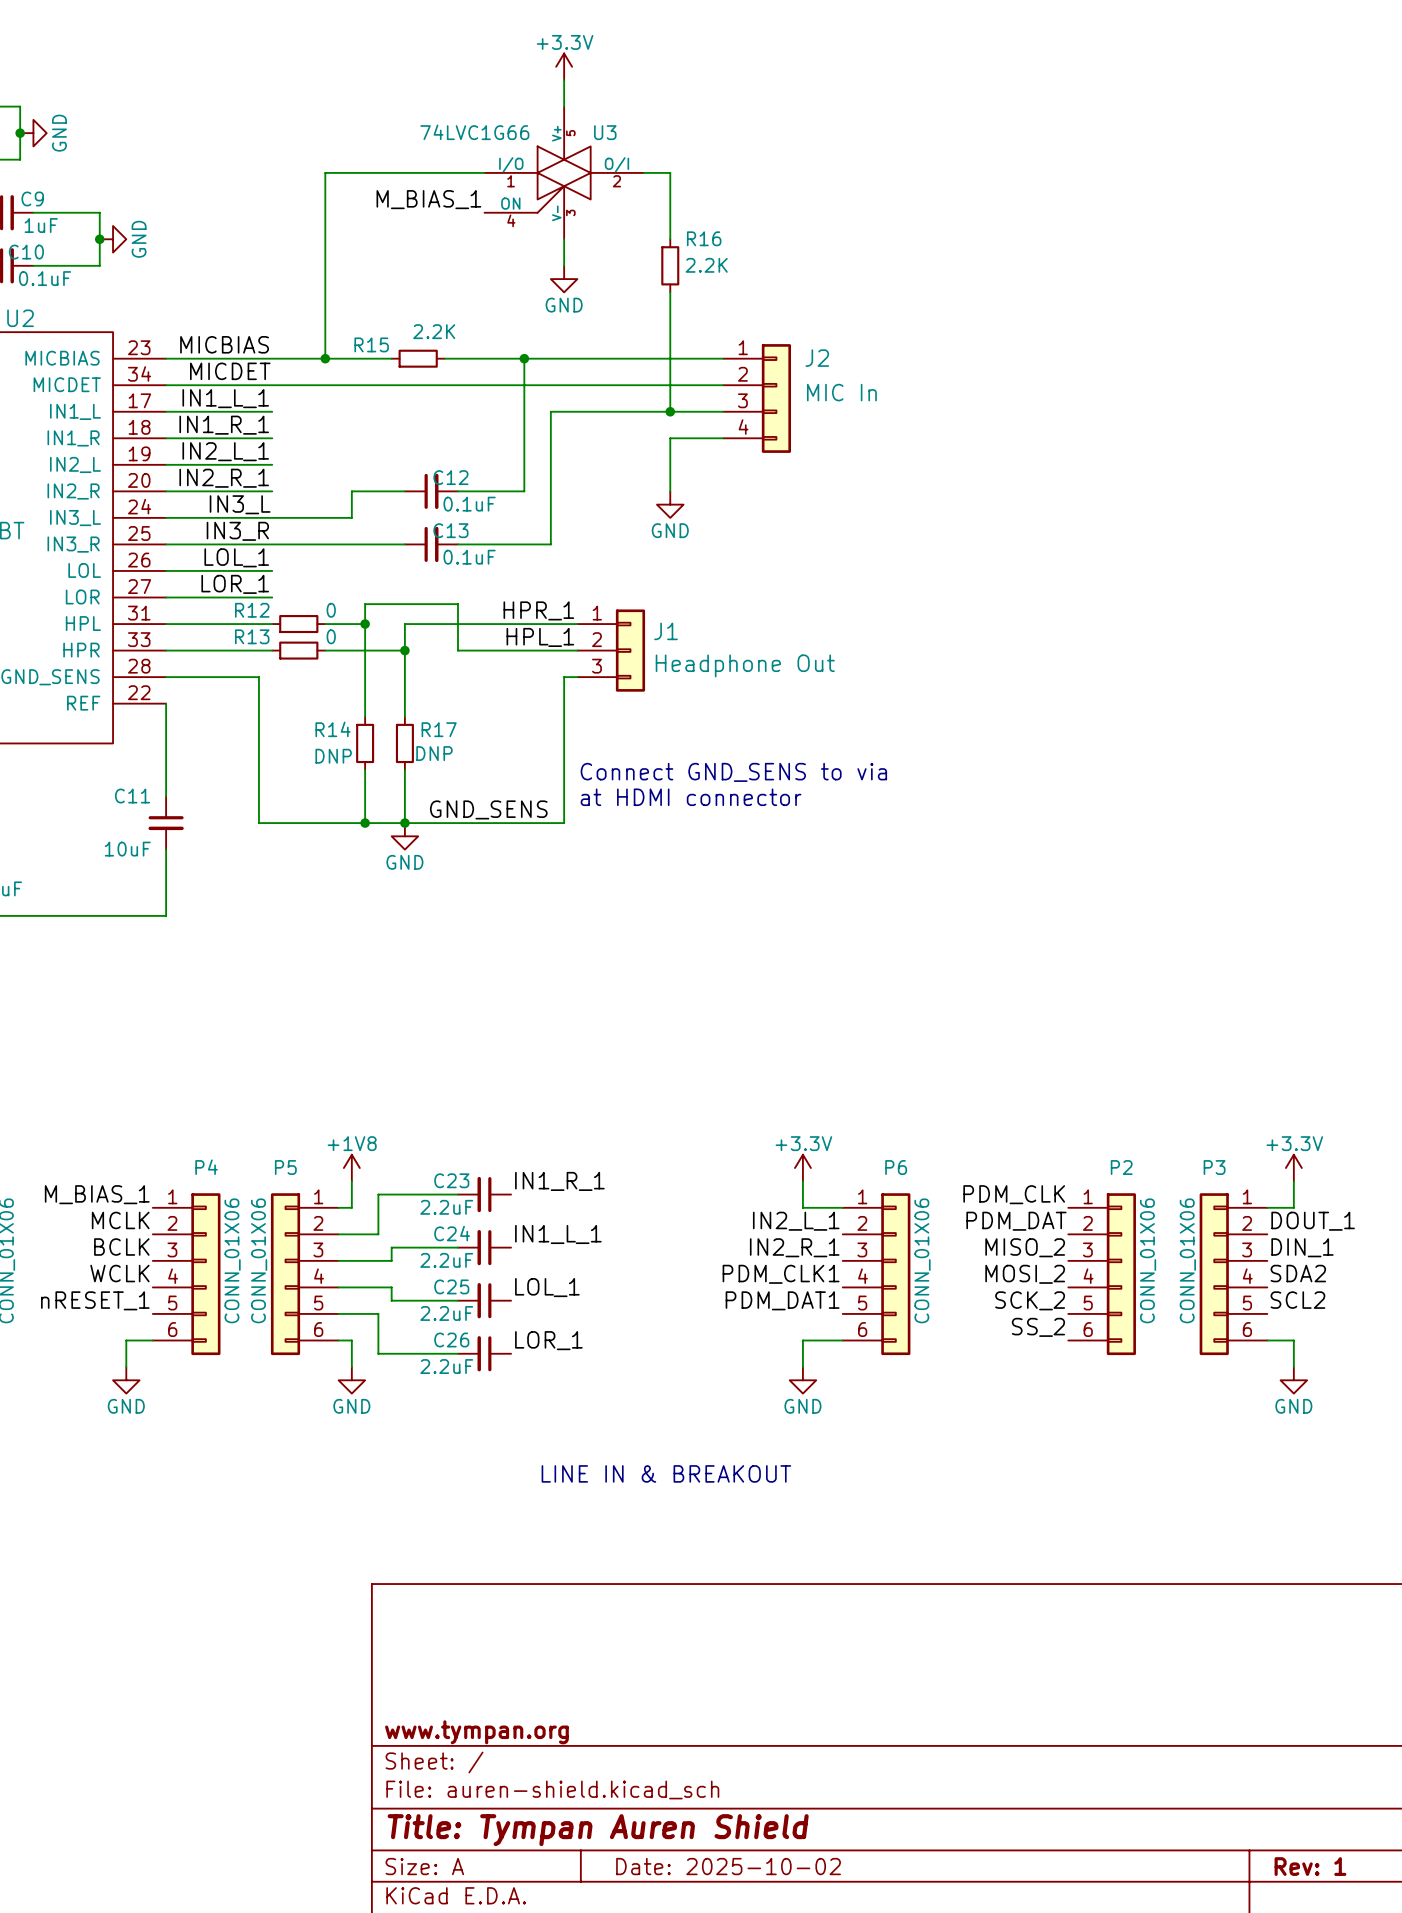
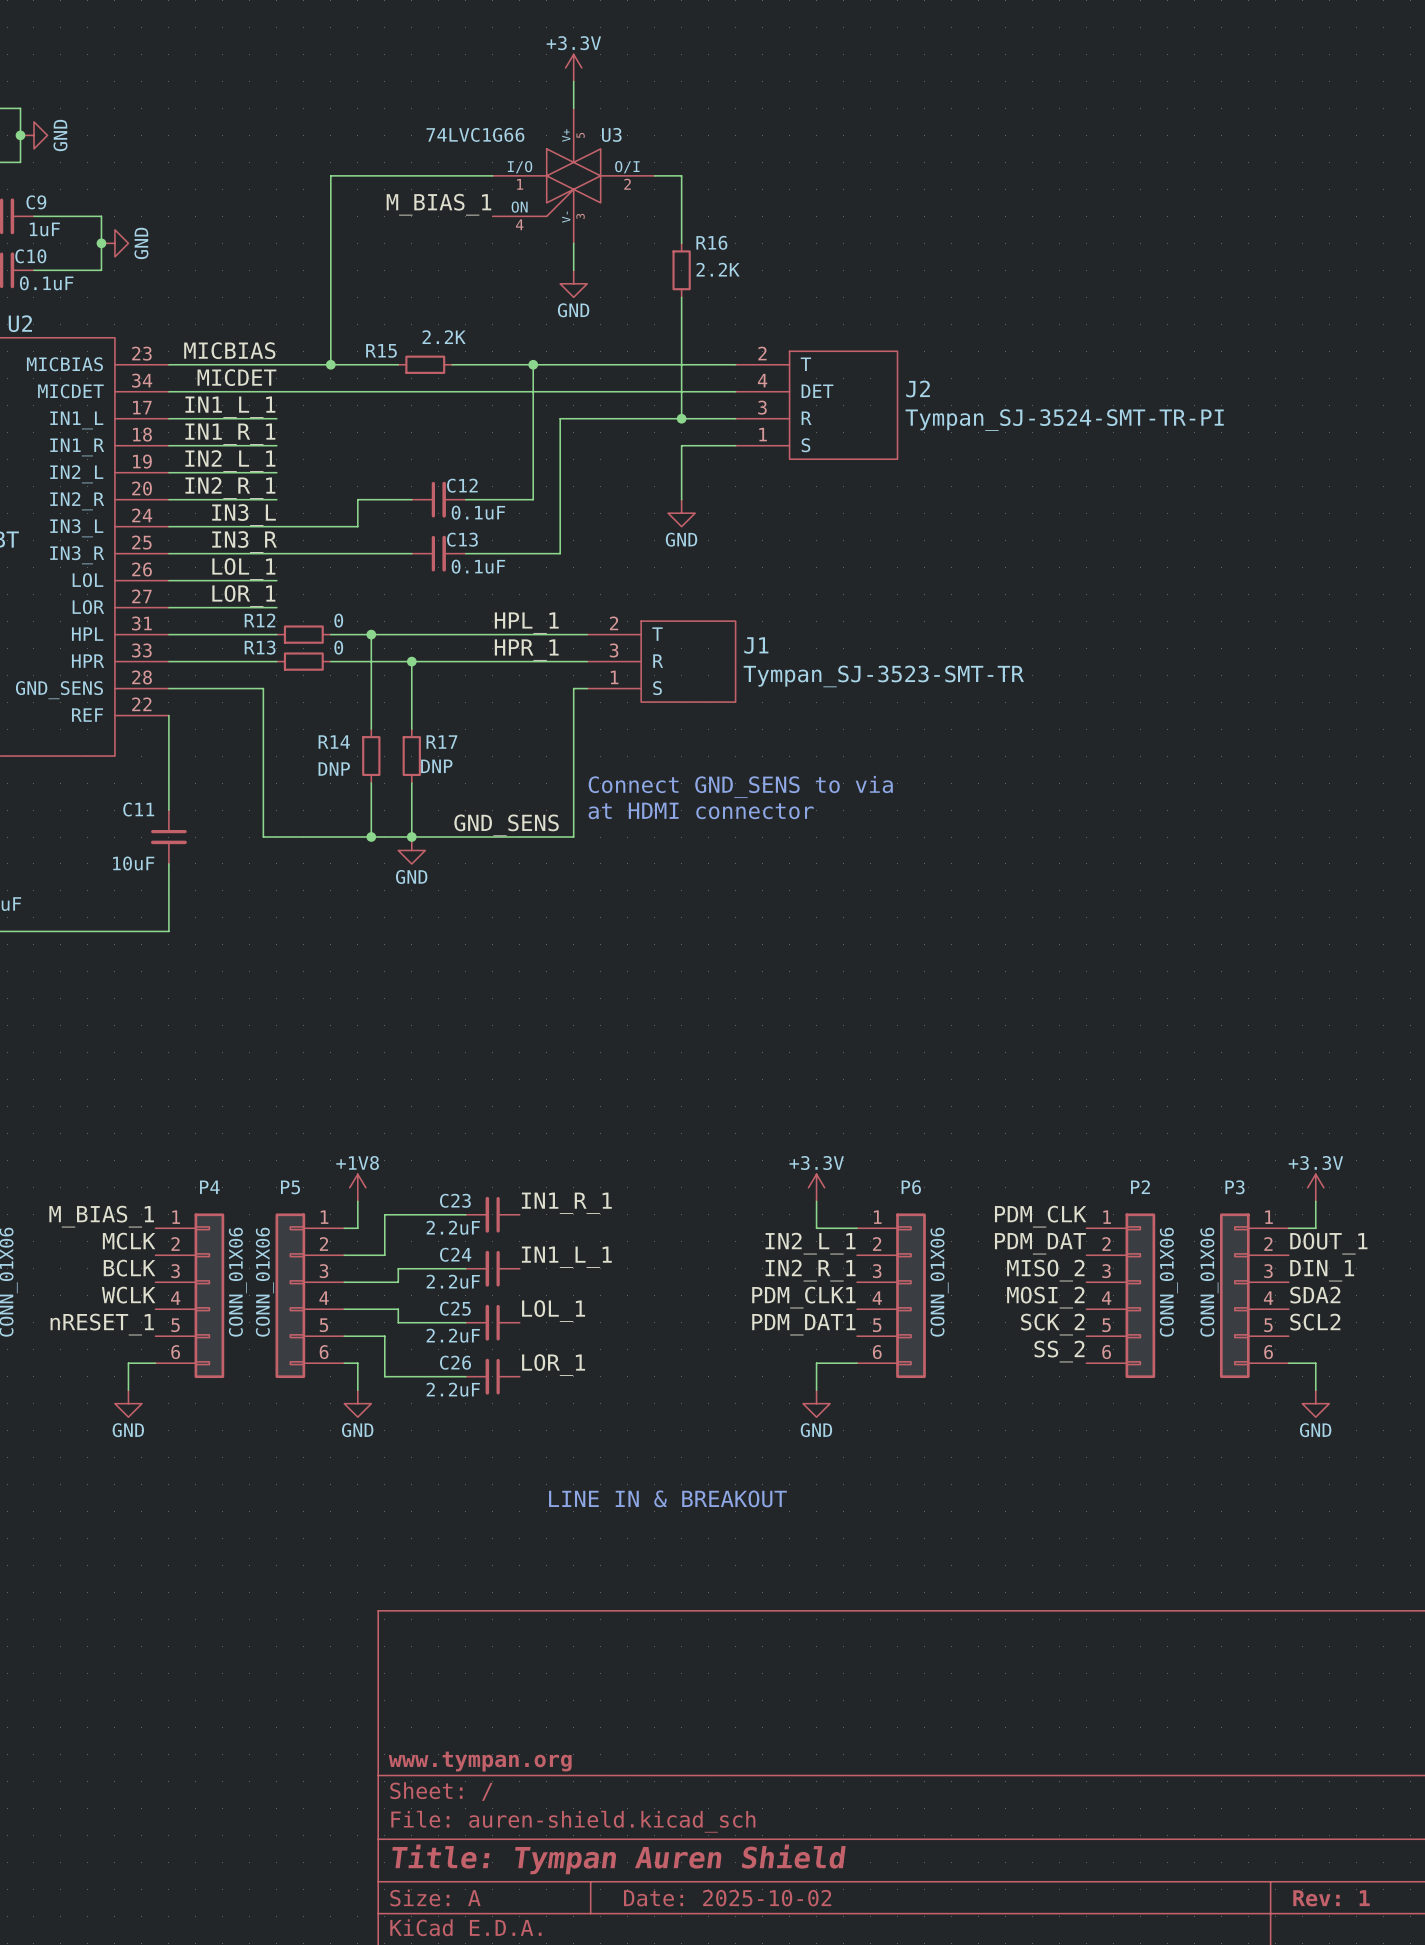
J2 symbol: [723, 344, 792, 453] -> [735, 351, 898, 460]
J2 name position: J2 (817, 358) -> J2 (918, 389)
J2 value: MIC In (841, 392) -> Tympan_SJ-3524-SMT-TR-PI (1064, 420)
J1 symbol: [577, 609, 646, 692] -> [587, 621, 736, 703]
label position: HPR_1 (538, 610) -> HPR_1 (526, 650)
wire: (365, 624) (365, 604) (457, 604) (457, 650) -> (411, 661) (465, 661)
wire: (404, 624) (404, 650) -> (411, 634) (371, 634)
J1 name position: J1 (666, 631) -> J1 (756, 645)
label position: HPL_1 (540, 637) -> HPL_1 (526, 623)
J1 value: Headphone Out (745, 665) -> Tympan_SJ-3523-SMT-TR (883, 676)

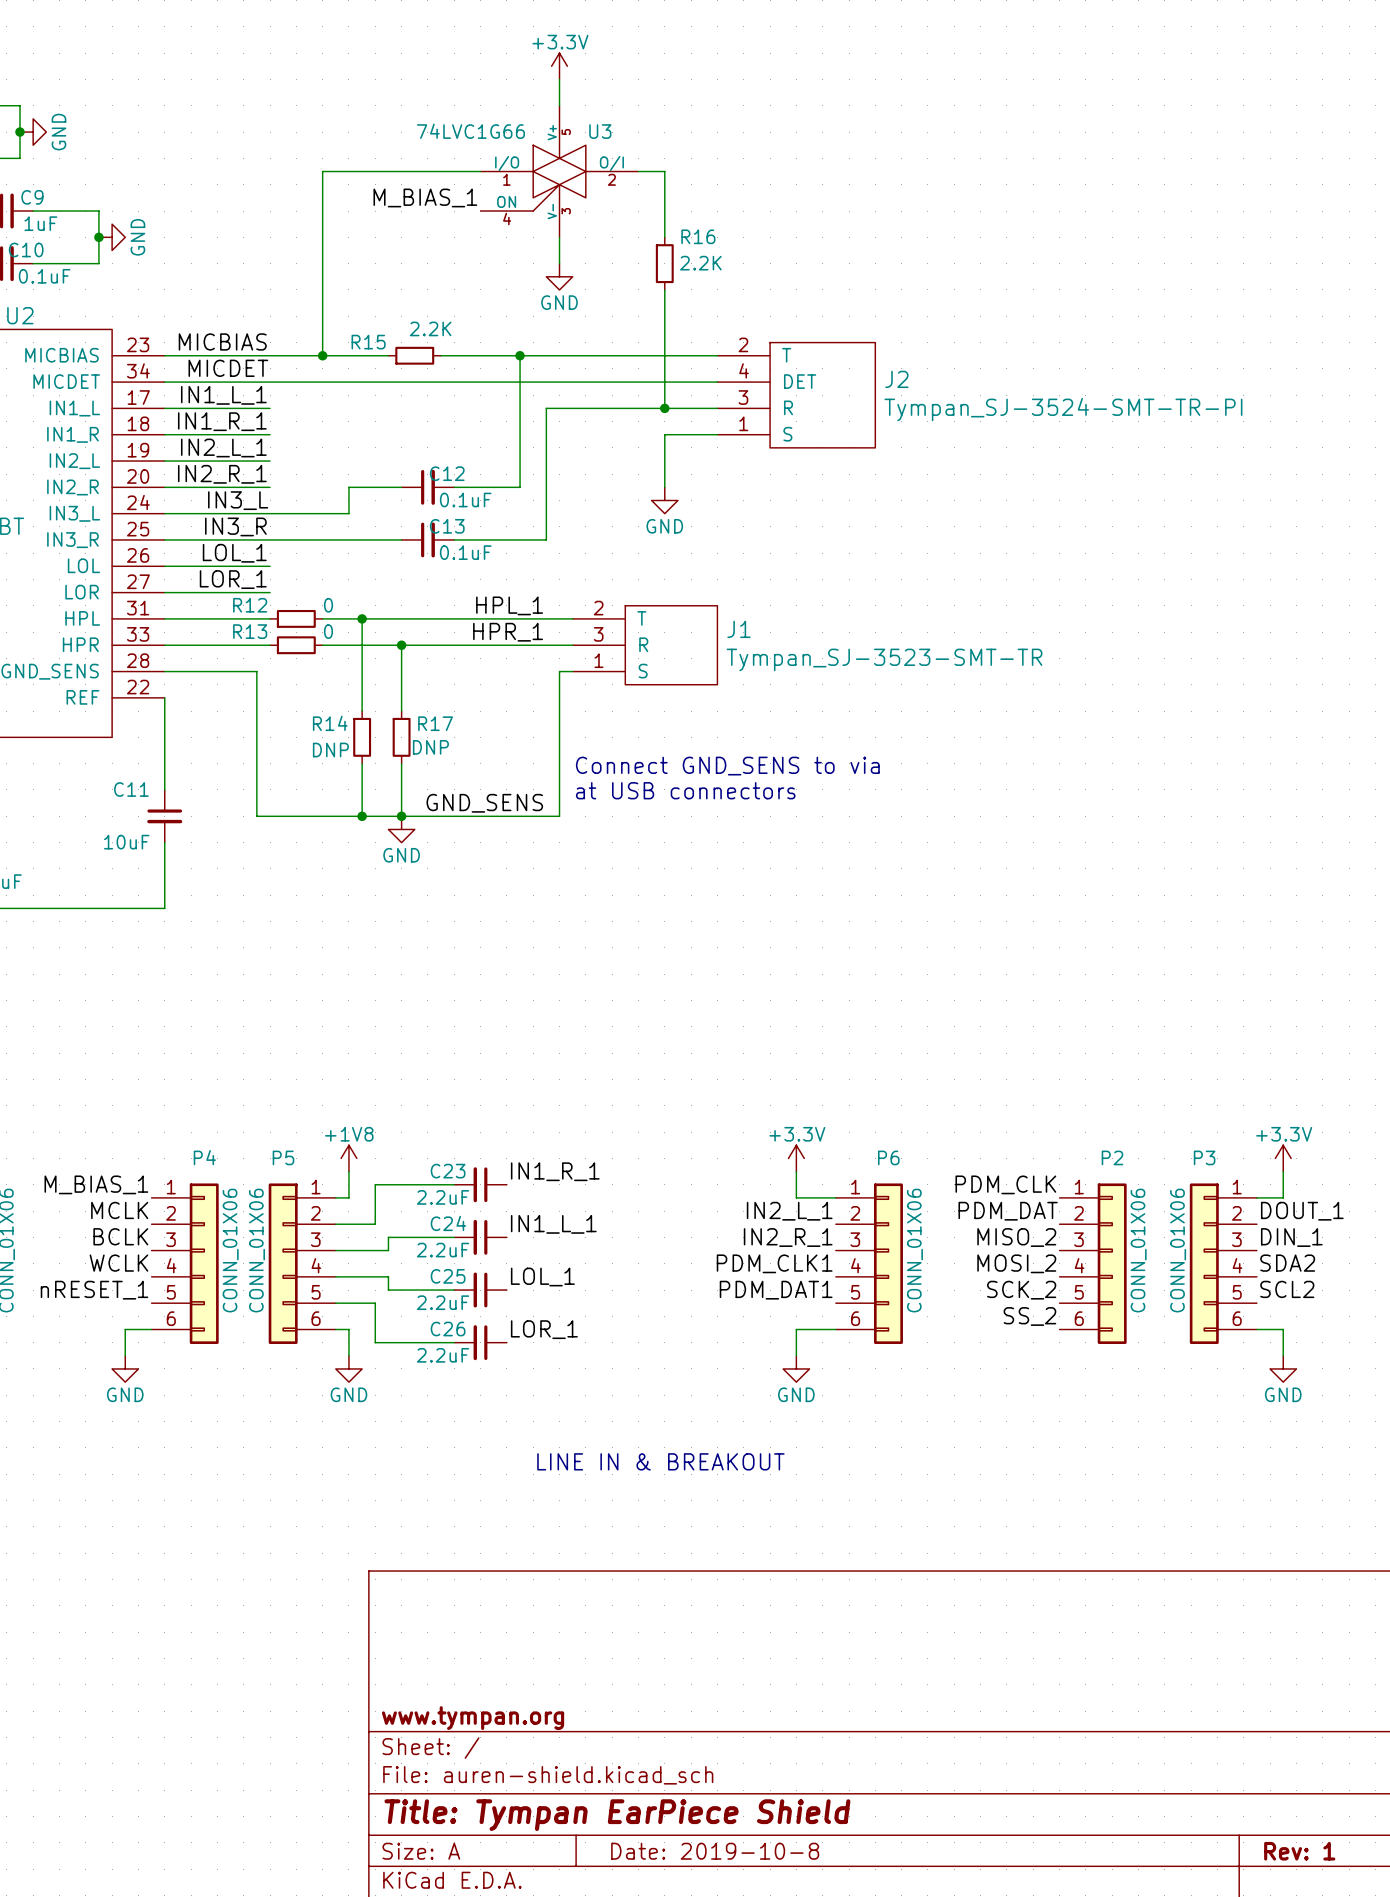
text: at HDMI connector (701, 810) -> at USB connectors (685, 790)
title block: Title: Tympan Auren Shield (618, 1859) -> Title: Tympan EarPiece Shield (617, 1815)
title block: Date: 2025-10-02 (727, 1898) -> Date: 2019-10-8 (715, 1851)

